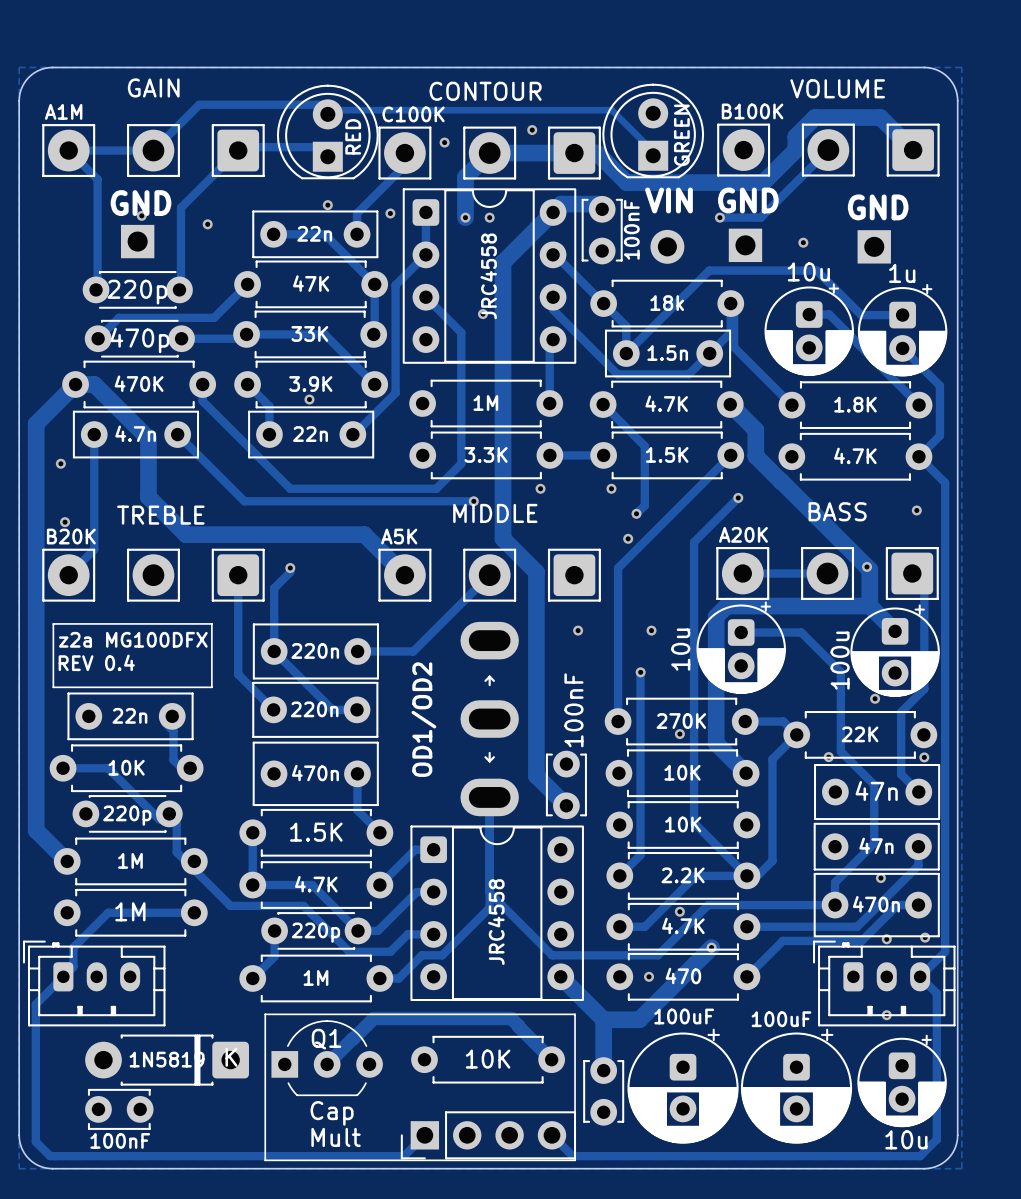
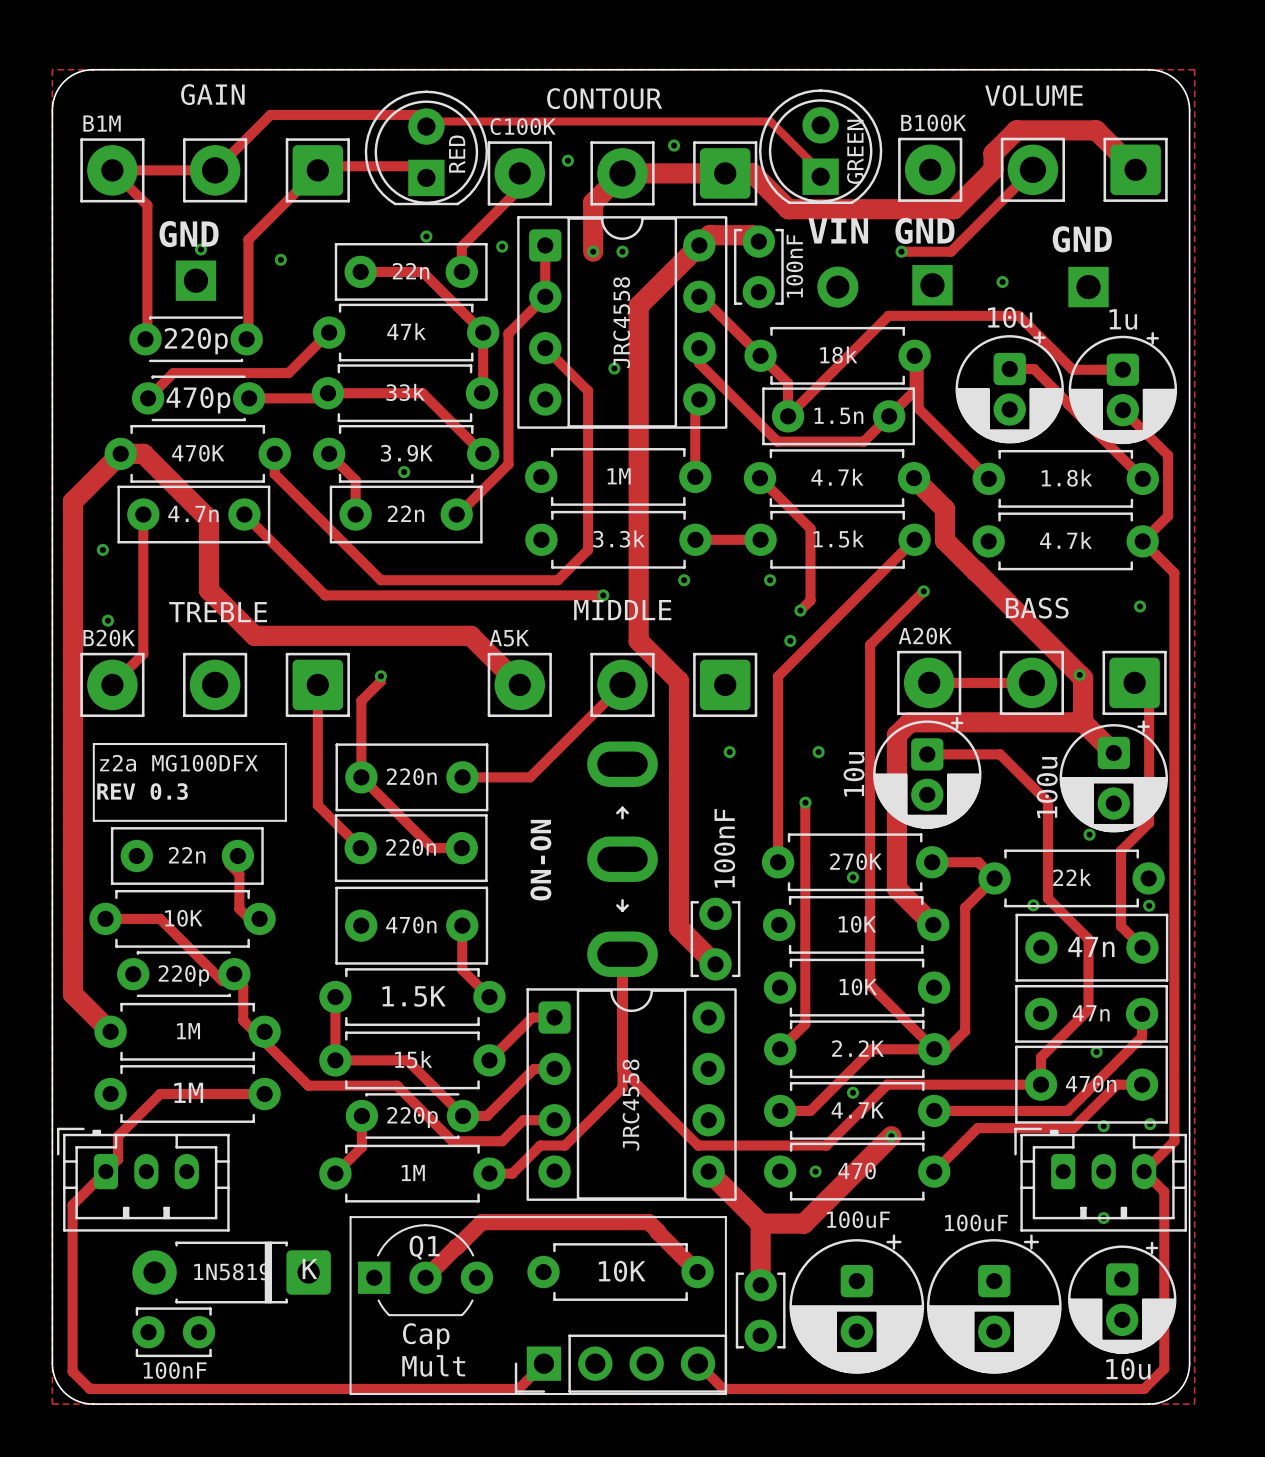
part value: A1M (63, 111) -> B1M (102, 123)
part value: 47K (311, 283) -> 47k (406, 331)
part value: 33K (309, 333) -> 33k (405, 392)
part value: 4.7K (666, 403) -> 4.7k (837, 477)
part value: 1.8K (855, 404) -> 1.8k (1066, 478)
part value: 3.3K (486, 454) -> 3.3k (619, 539)
part value: 1.5K (667, 454) -> 1.5k (838, 539)
part value: 4.7K (855, 455) -> 4.7k (1066, 540)
text: REV 0.4 (96, 662) -> REV 0.3 (142, 791)
part value: OD1/OD2 (423, 719) -> ON-ON (540, 860)
part value: 22K (860, 734) -> 22k (1072, 877)
part value: 4.7K (316, 884) -> 15k (413, 1059)

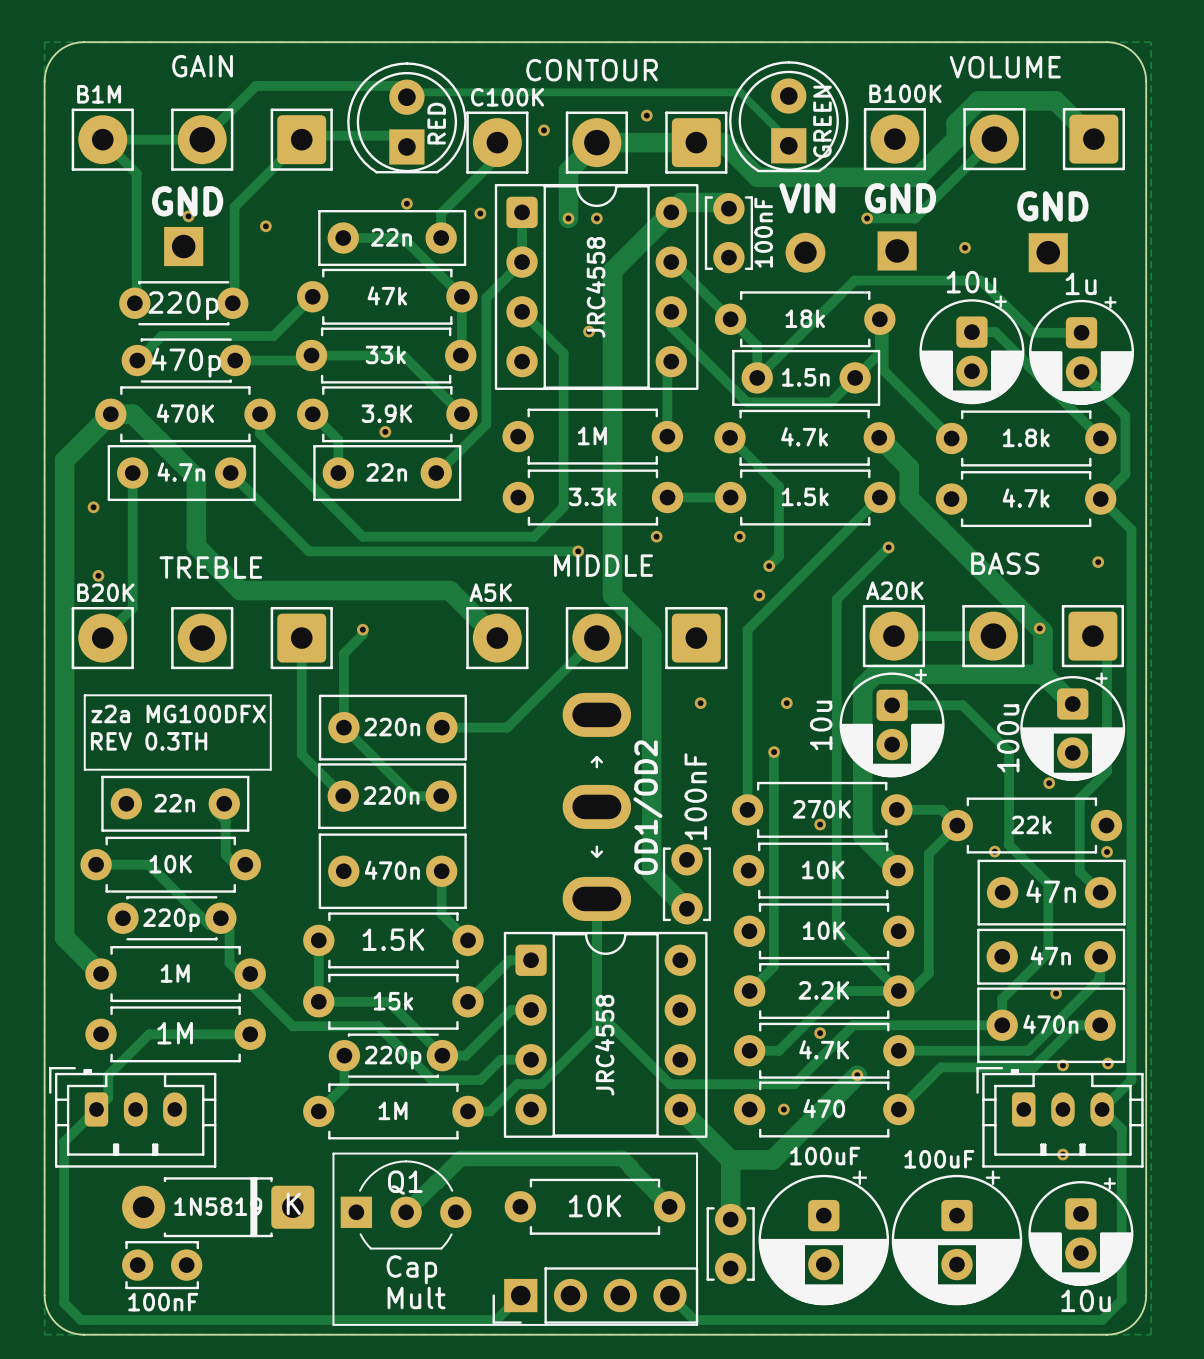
text: REV 0.3 (142, 791) -> REV 0.3TH (149, 741)
part value: ON-ON (540, 860) -> OD1/OD2 (647, 807)

